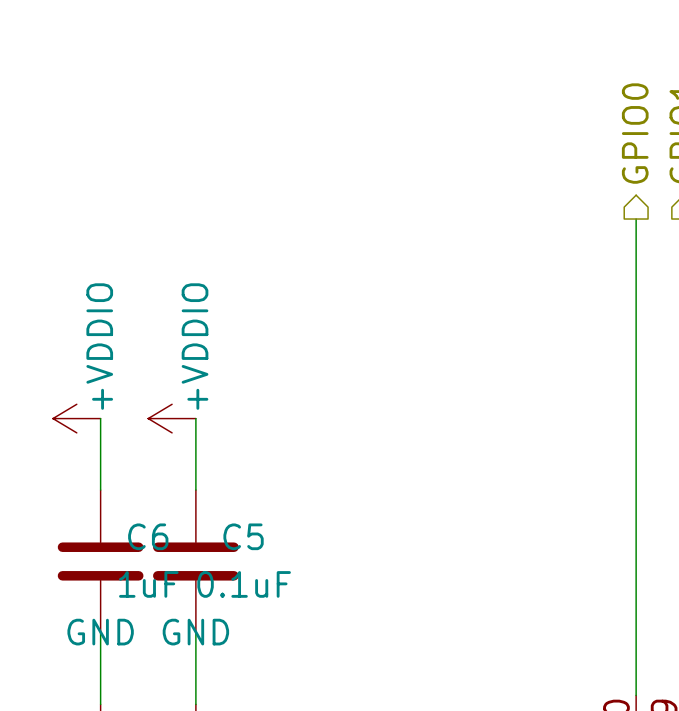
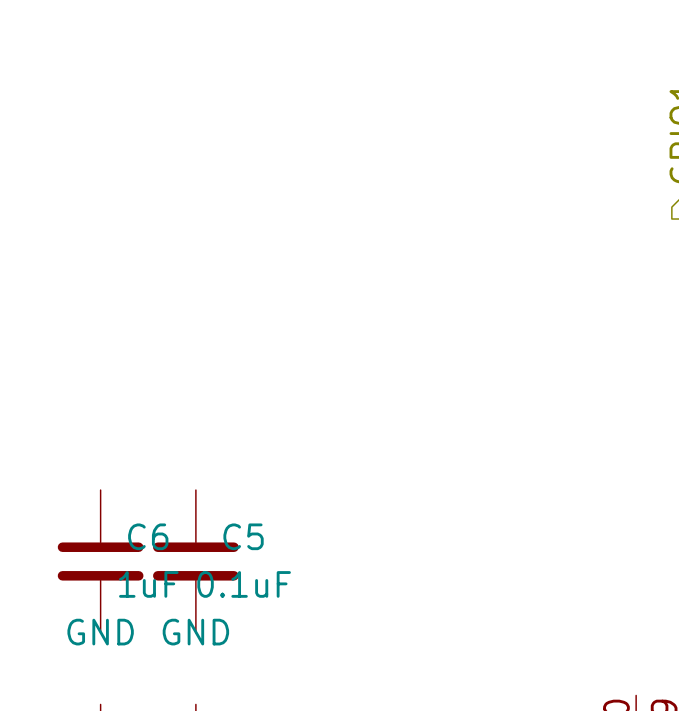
hierarchical label: GPIO0 (635, 133) -> none
wire: (636, 219) (636, 695) -> none
power symbol: +VDDIO (76, 418) -> none
wire: (100, 418) (100, 490) -> none
power symbol: +VDDIO (172, 418) -> none
wire: (195, 418) (195, 490) -> none
wire: (100, 632) (100, 704) -> none
wire: (195, 632) (195, 704) -> none

